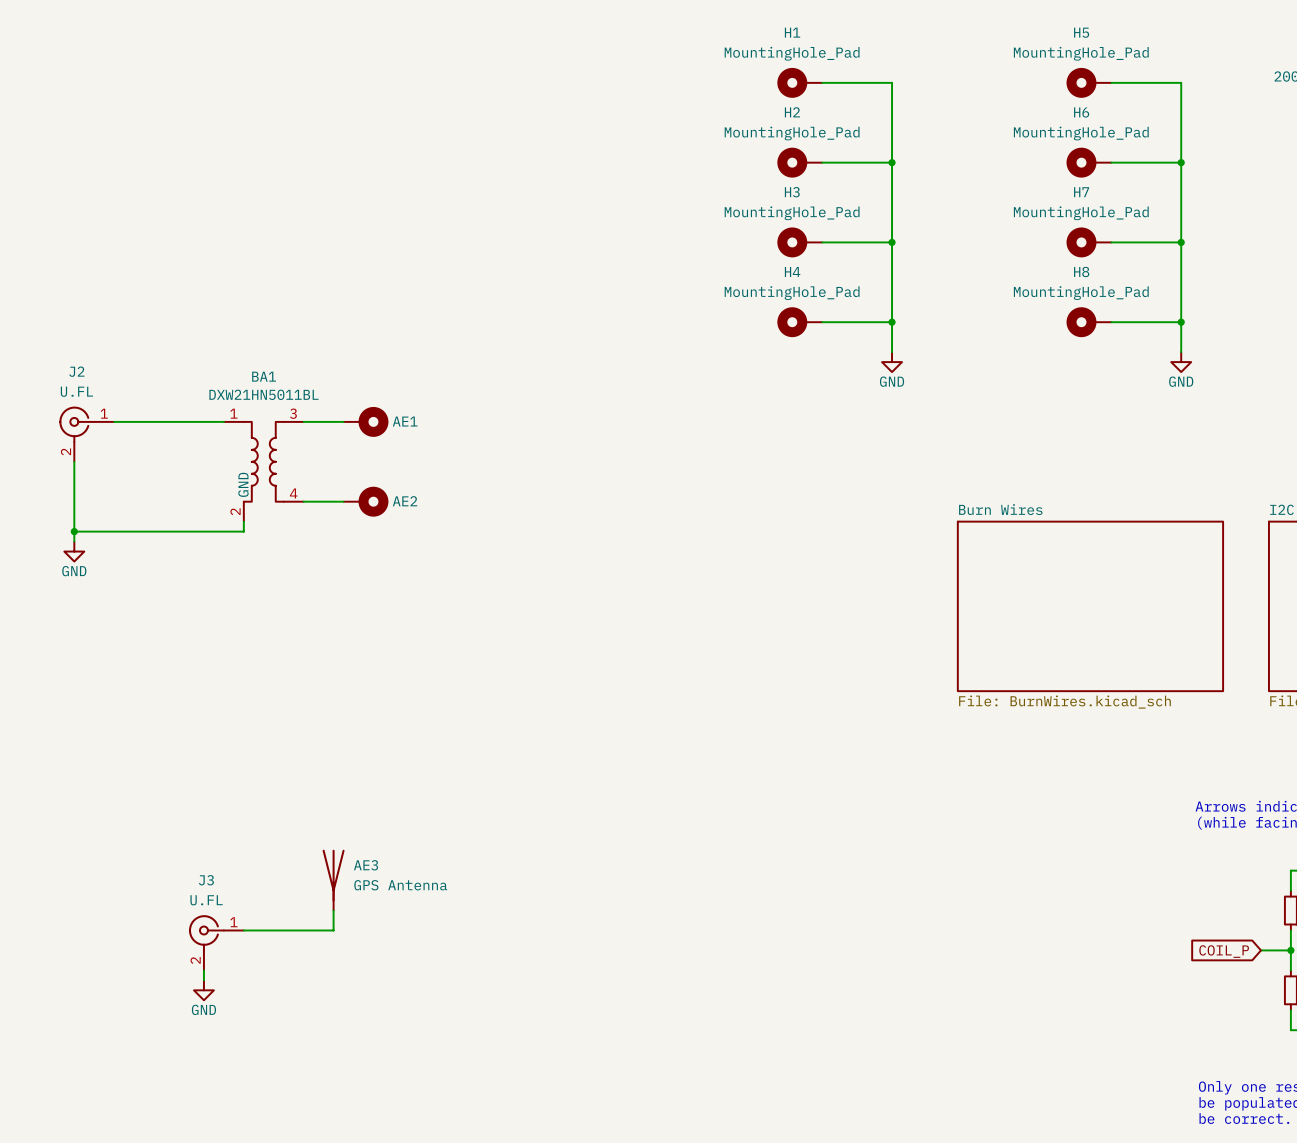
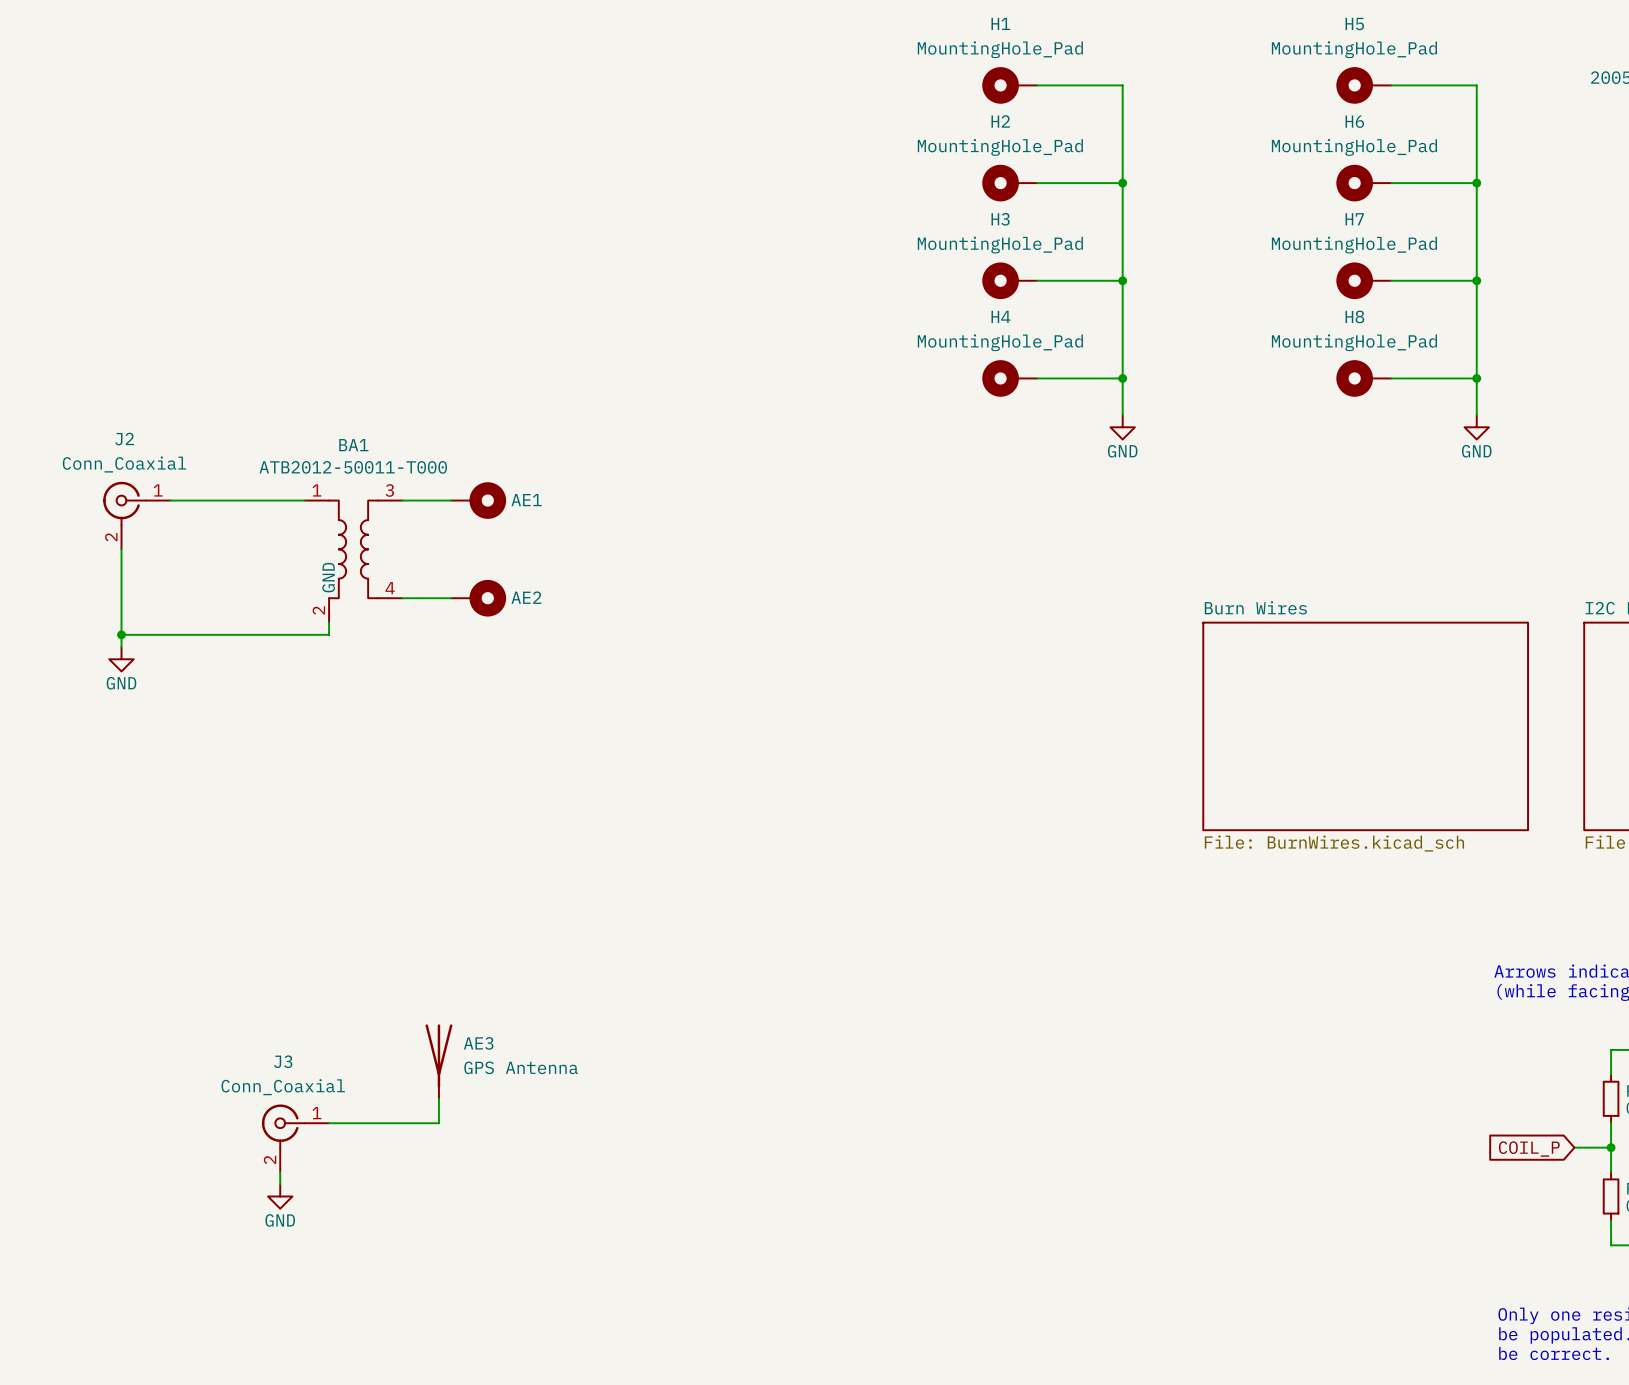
J2 value: U.FL (76, 391) -> Conn_Coaxial (124, 464)
BA1 value: DXW21HN5011BL (264, 394) -> ATB2012-50011-T000 (353, 467)
J3 value: U.FL (206, 900) -> Conn_Coaxial (283, 1087)

